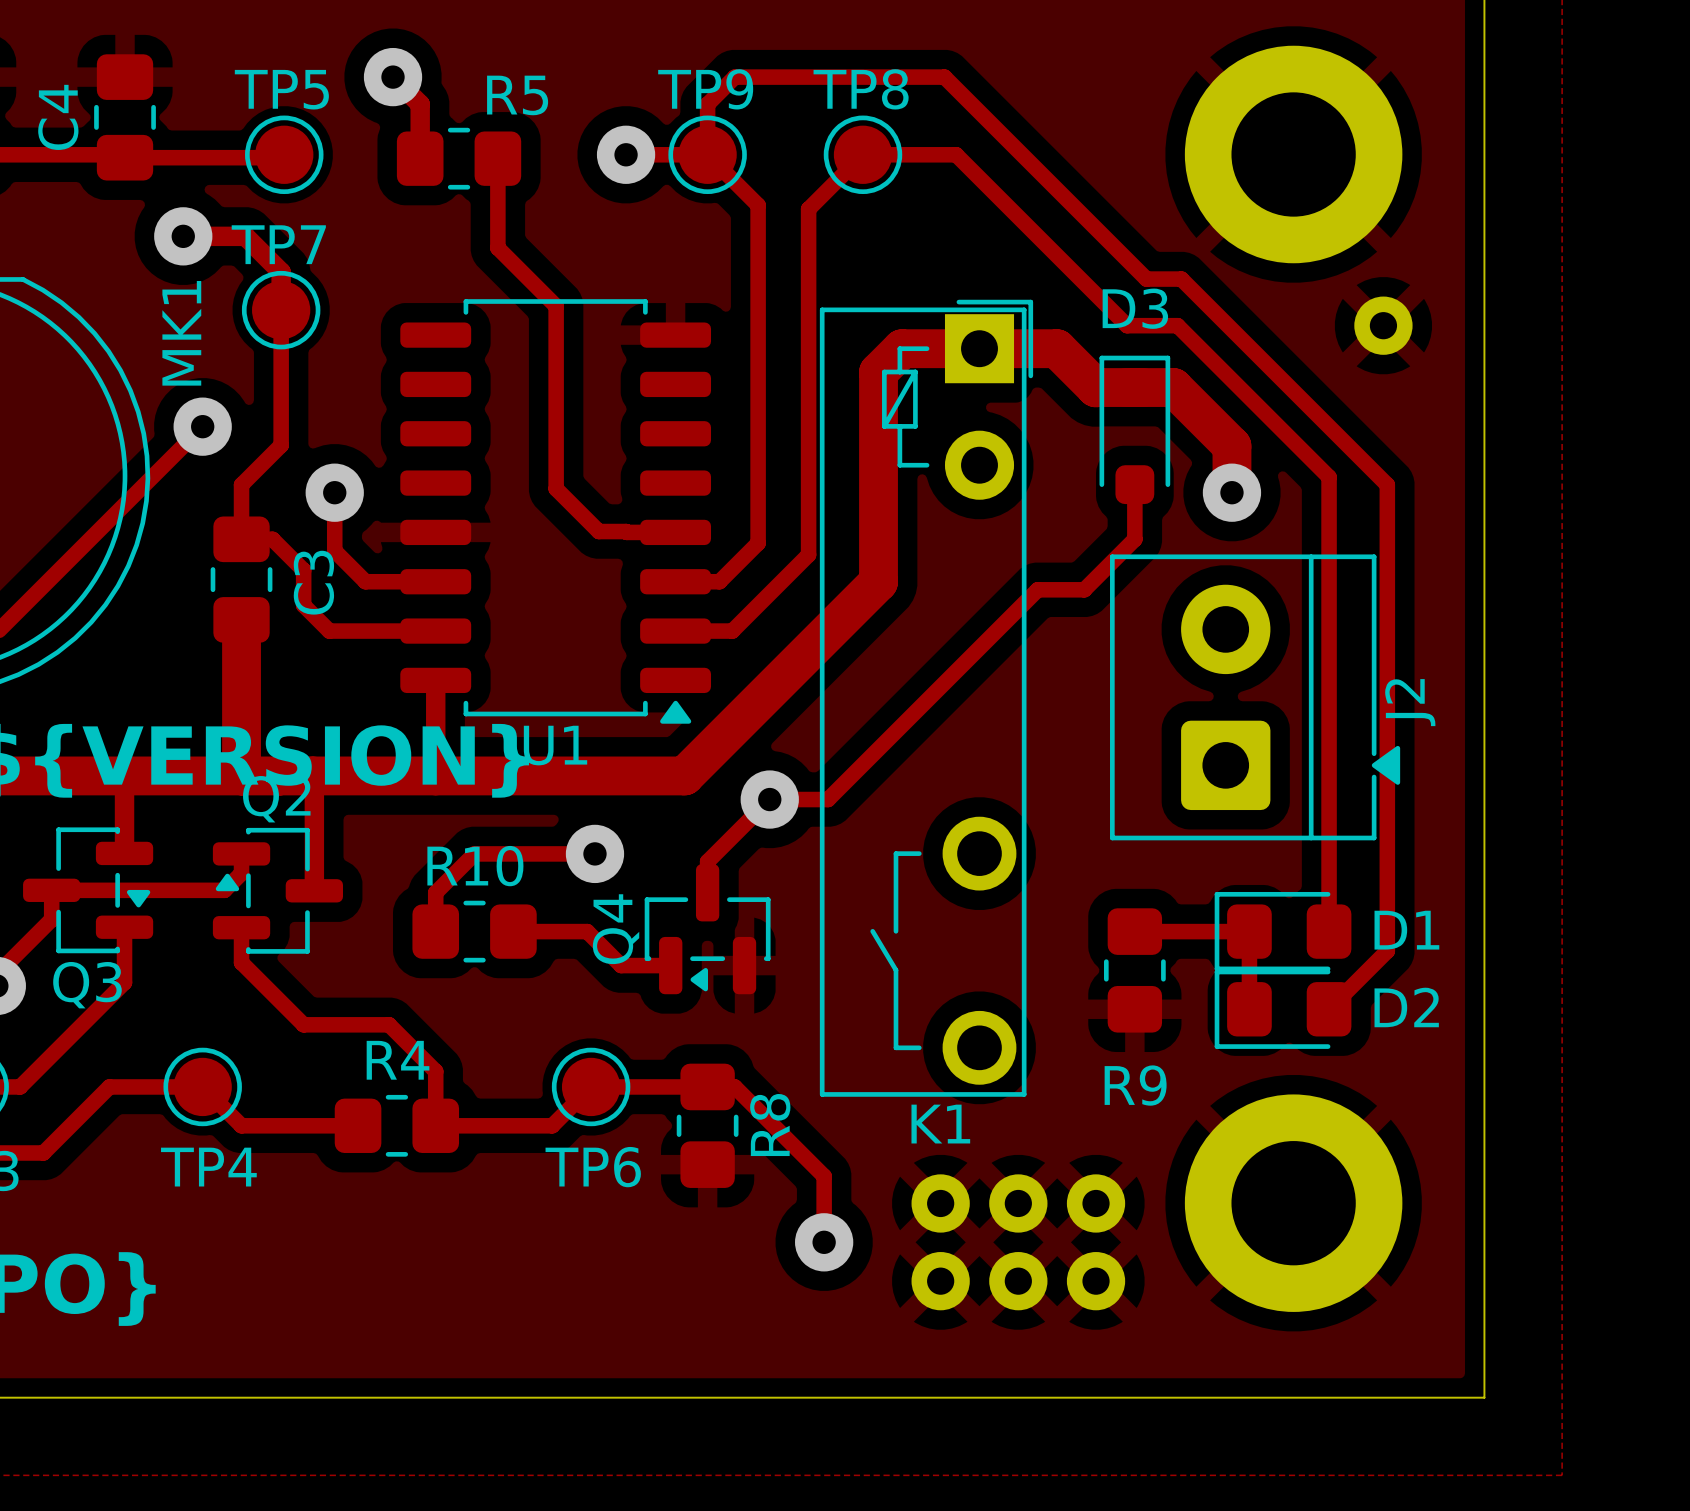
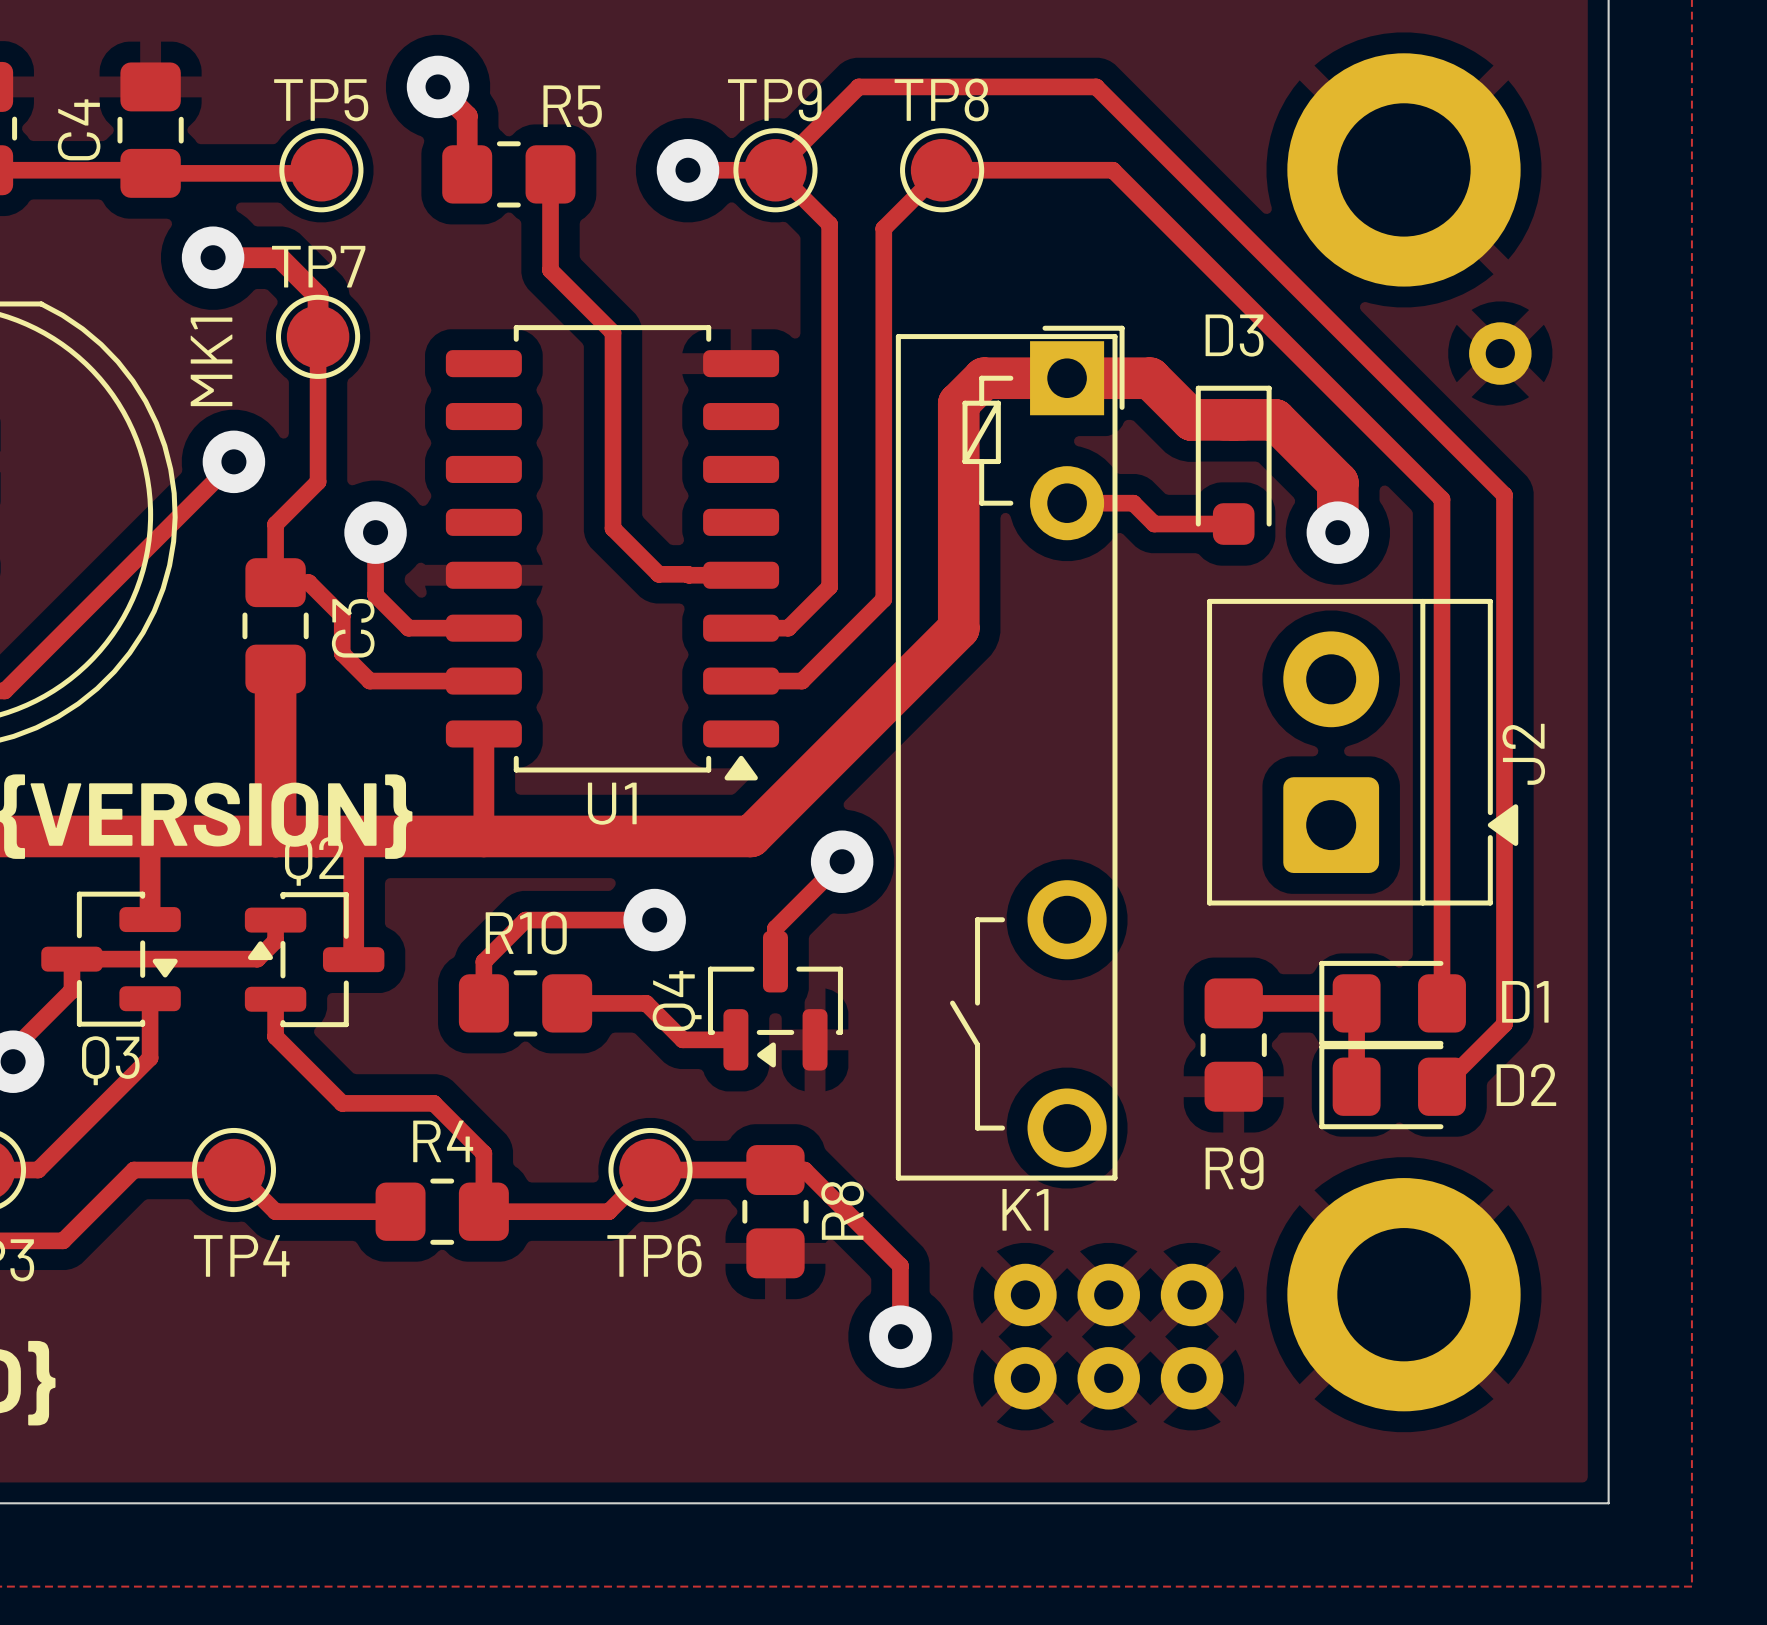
track: (785, 77) (734, 77) (707, 104) (707, 154) -> (858, 86) (775, 170)
track: (944, 77) (1022, 154) -> (1042, 170) (1112, 170)
track: none -> (1029, 86) (1096, 86) (1504, 495) (1504, 524)
track: (956, 154) (1127, 325) (1177, 325) (1329, 477) -> none
track: (1146, 279) (1181, 279) (1387, 484) -> (1246, 303) (1442, 499) (1442, 516)
track: (1134, 484) (1134, 539) (1084, 589) (1037, 589) (828, 799) (769, 799) -> (1233, 524) (1154, 524) (1133, 503) (1067, 503)

